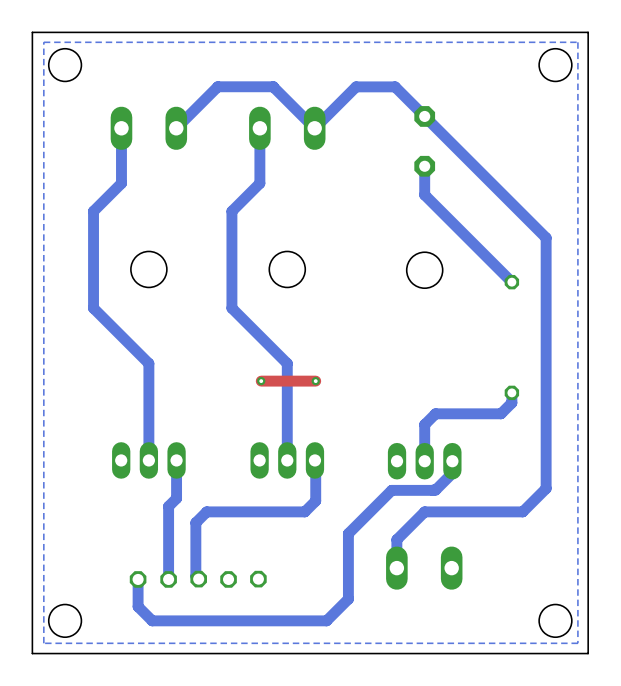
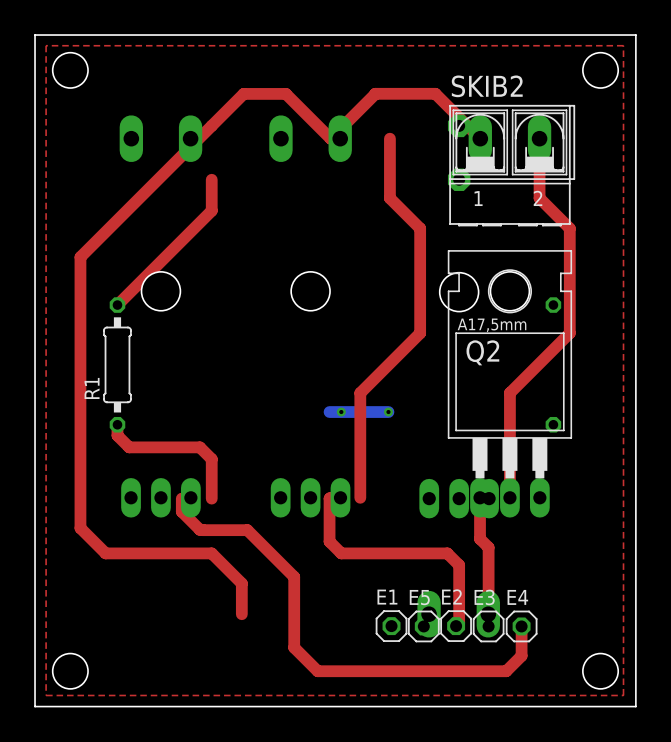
top zone outline: none -> (46, 45) (46, 695) (623, 695) (623, 45) (46, 45)
bottom zone outline: (43, 42) (43, 643) (577, 643) (577, 42) (43, 42) -> none
bottom track: (121, 128) (121, 183) (93, 211) (93, 308) (148, 363) (148, 460) -> none
bottom track: (176, 128) (217, 86) (273, 86) (314, 128) (356, 86) (395, 86) (546, 237) (546, 488) (522, 511) (424, 511) (396, 539) (396, 568) -> none
bottom track: (259, 128) (259, 183) (231, 211) (231, 308) (287, 363) (287, 460) -> none
top track: none -> (389, 138) (389, 198) (420, 228) (420, 333) (360, 393) (360, 497)
top track: none -> (480, 138) (435, 93) (375, 93) (330, 138) (285, 93) (243, 93) (80, 257) (80, 528) (105, 553) (211, 553) (241, 583) (241, 614)
top track: none -> (539, 138) (539, 198) (569, 228) (569, 333) (509, 393) (509, 497)
SKIB2: none -> (512, 165)
top track: none -> (211, 179) (211, 210) (117, 305)
bottom track: (424, 166) (424, 194) (511, 282) -> none
R1: none -> (117, 364)
Q2: none -> (509, 383)
top track: (261, 381) (315, 381) -> none
via: (261, 381) -> none
bottom track: none -> (329, 412) (388, 412)
via: none -> (388, 412)
top track: none -> (117, 424) (117, 435) (129, 447) (199, 447) (211, 459) (211, 498)
bottom track: (511, 392) (511, 402) (500, 413) (435, 413) (424, 424) (424, 461) -> none
bottom track: (176, 460) (176, 498) (168, 506) (168, 579) -> none
top track: none -> (330, 497) (329, 541) (341, 553) (447, 553) (459, 565) (459, 623) (456, 626)
bottom track: (314, 460) (315, 500) (304, 511) (206, 511) (195, 522) (195, 576) (198, 579) -> none
top track: none -> (480, 497) (480, 538) (488, 547) (488, 626)
top track: none -> (181, 498) (181, 511) (199, 529) (247, 530) (294, 576) (294, 647) (317, 671) (506, 671) (521, 655) (521, 626)
bottom track: (452, 461) (452, 473) (435, 490) (391, 490) (348, 533) (348, 599) (326, 620) (152, 620) (138, 606) (138, 579) -> none
part: (138, 579) -> none
part: (168, 579) -> none
E2 side: bottom (198, 579) -> top (456, 626)
E5 side: bottom (228, 579) -> top (423, 626)
E1 side: bottom (258, 579) -> top (391, 626)
E3: none -> (488, 626)
E4: none -> (521, 626)

